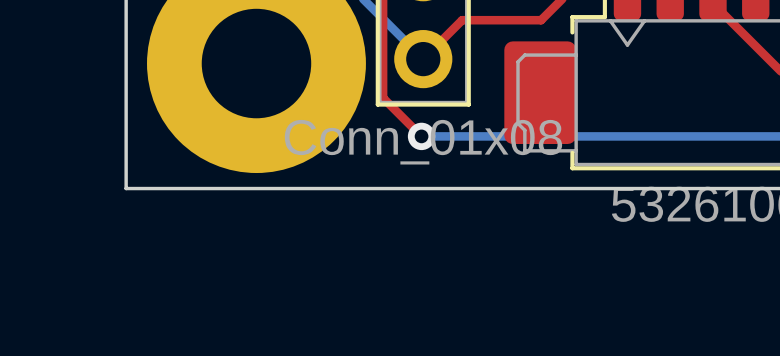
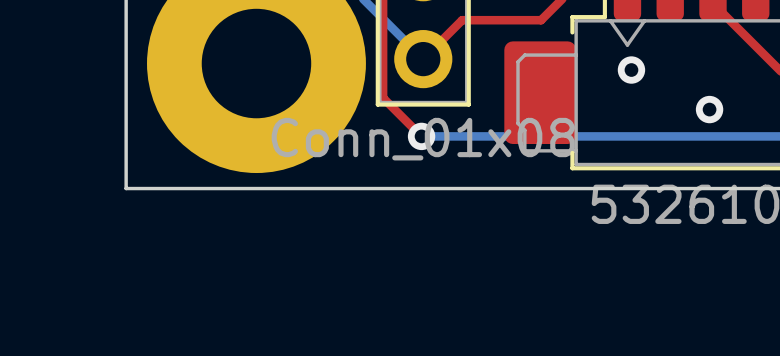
via: none -> (631, 70)
via: none -> (709, 109)

